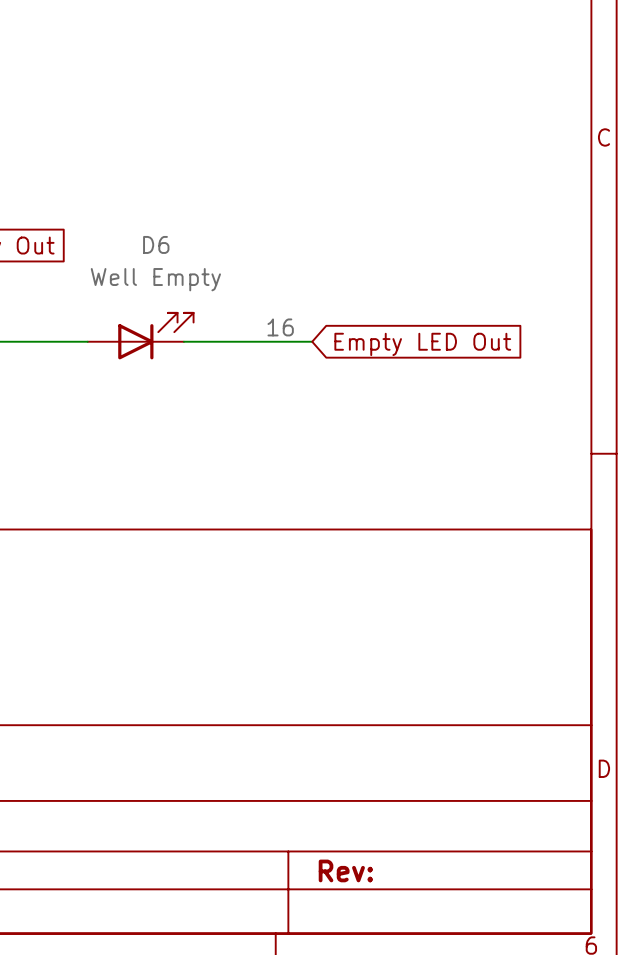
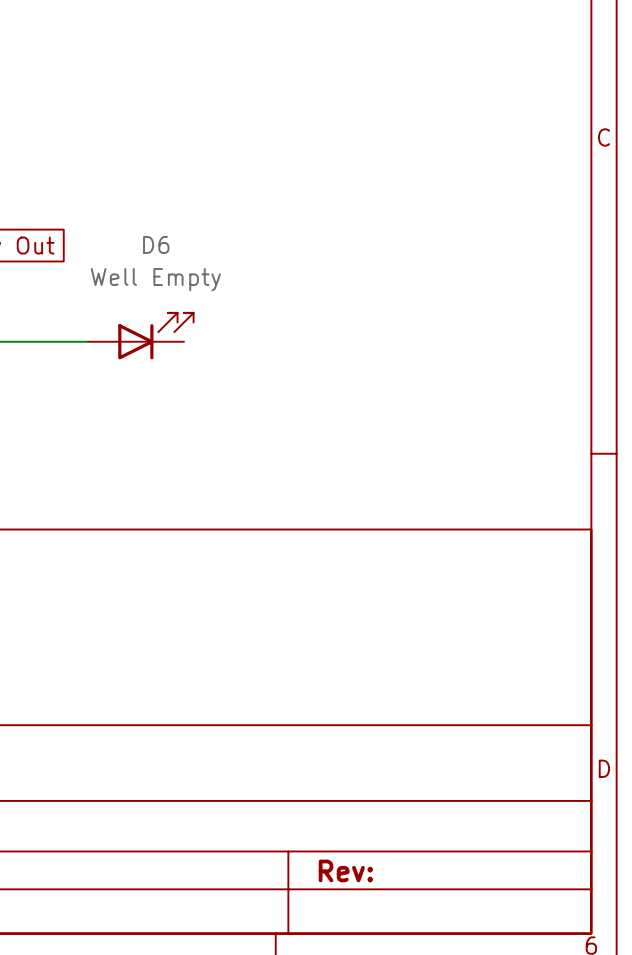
label: 16 (280, 327) -> none
wire: (183, 341) (312, 341) -> none
global label: Empty LED Out (422, 344) -> none

